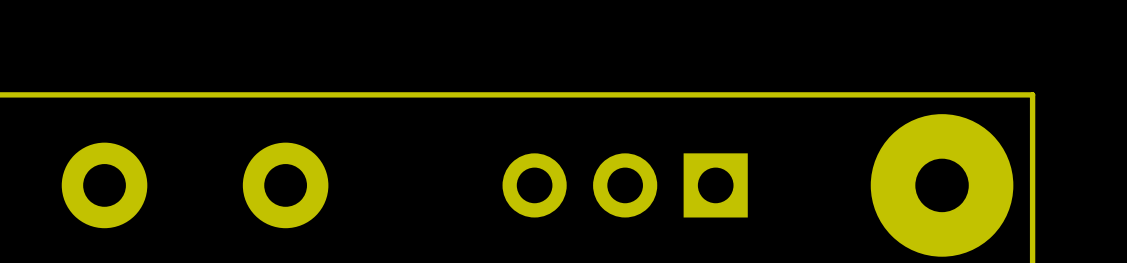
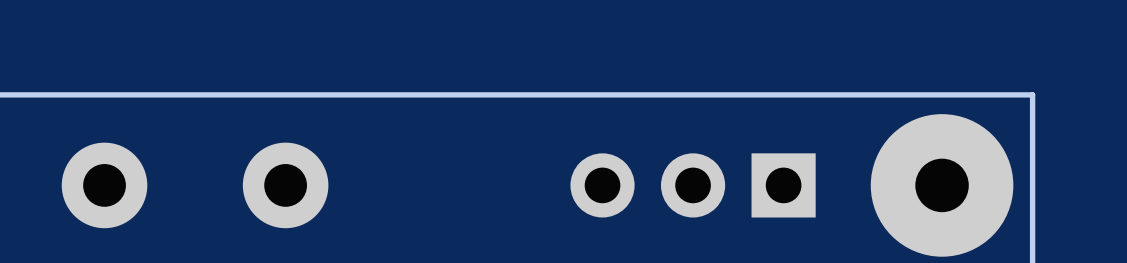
part position: (625, 185) -> (693, 185)

